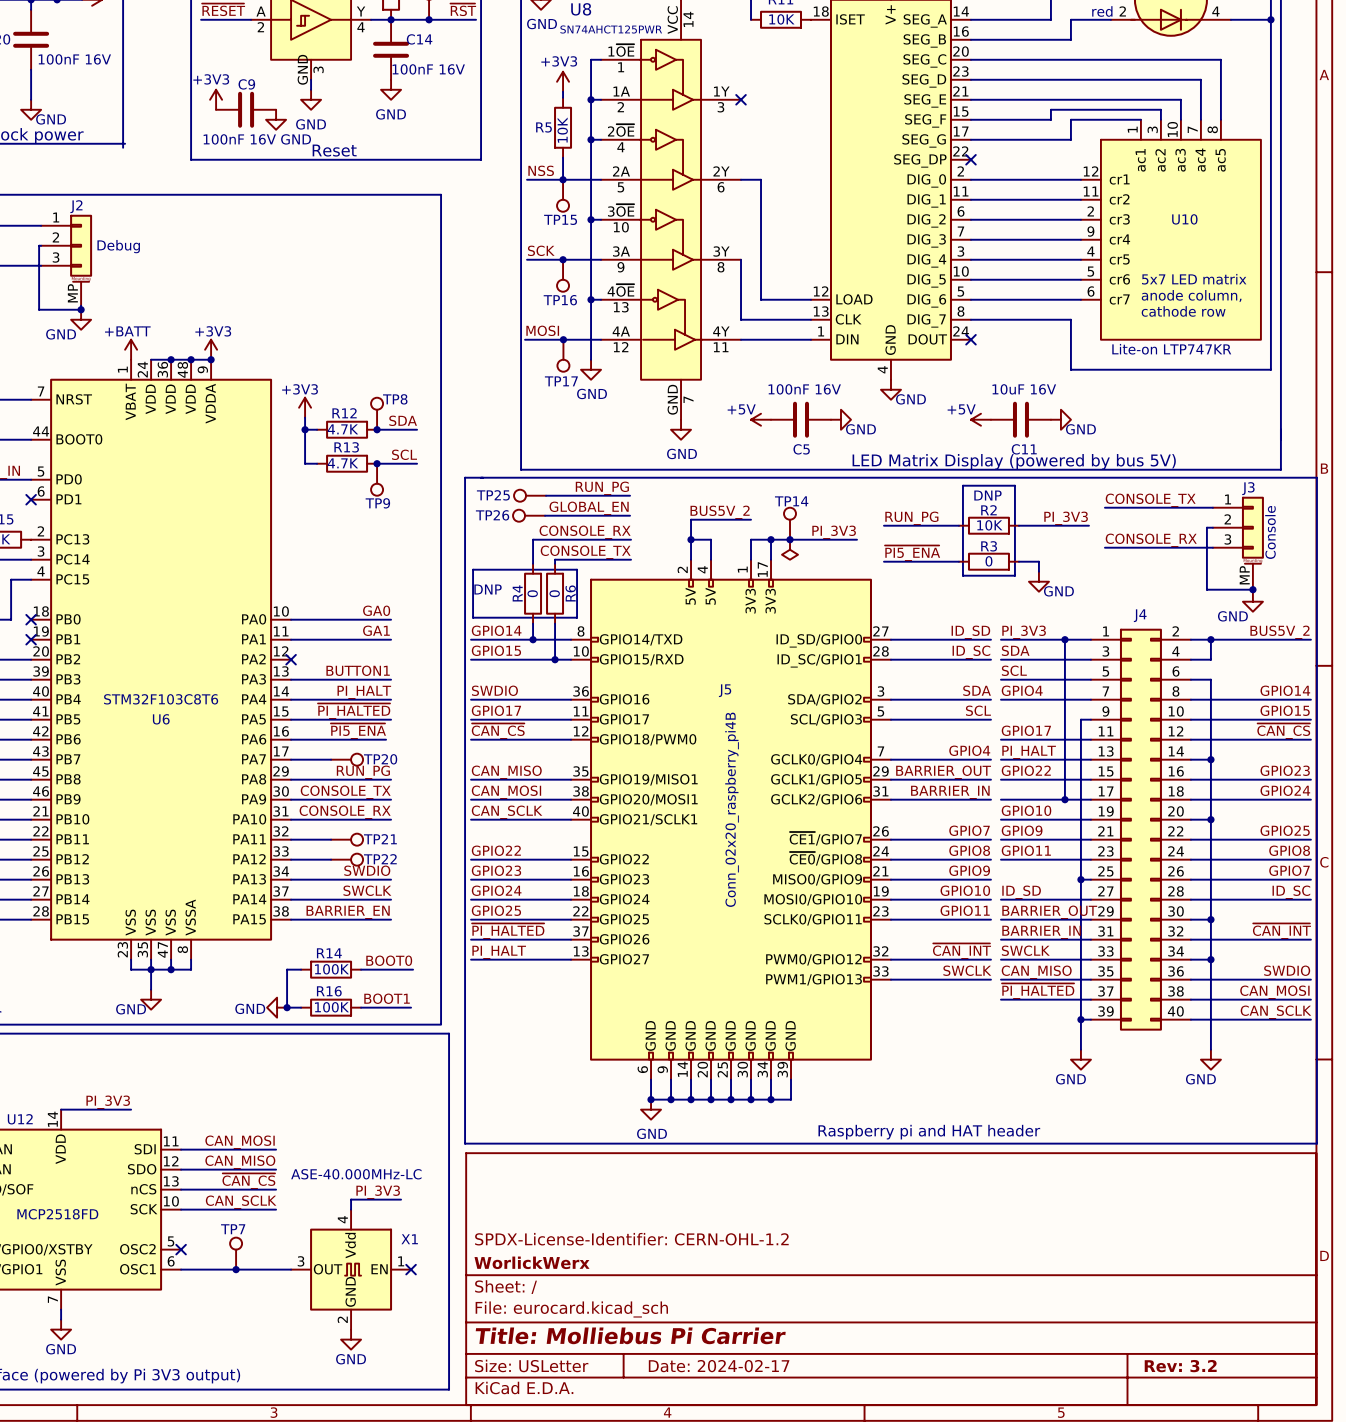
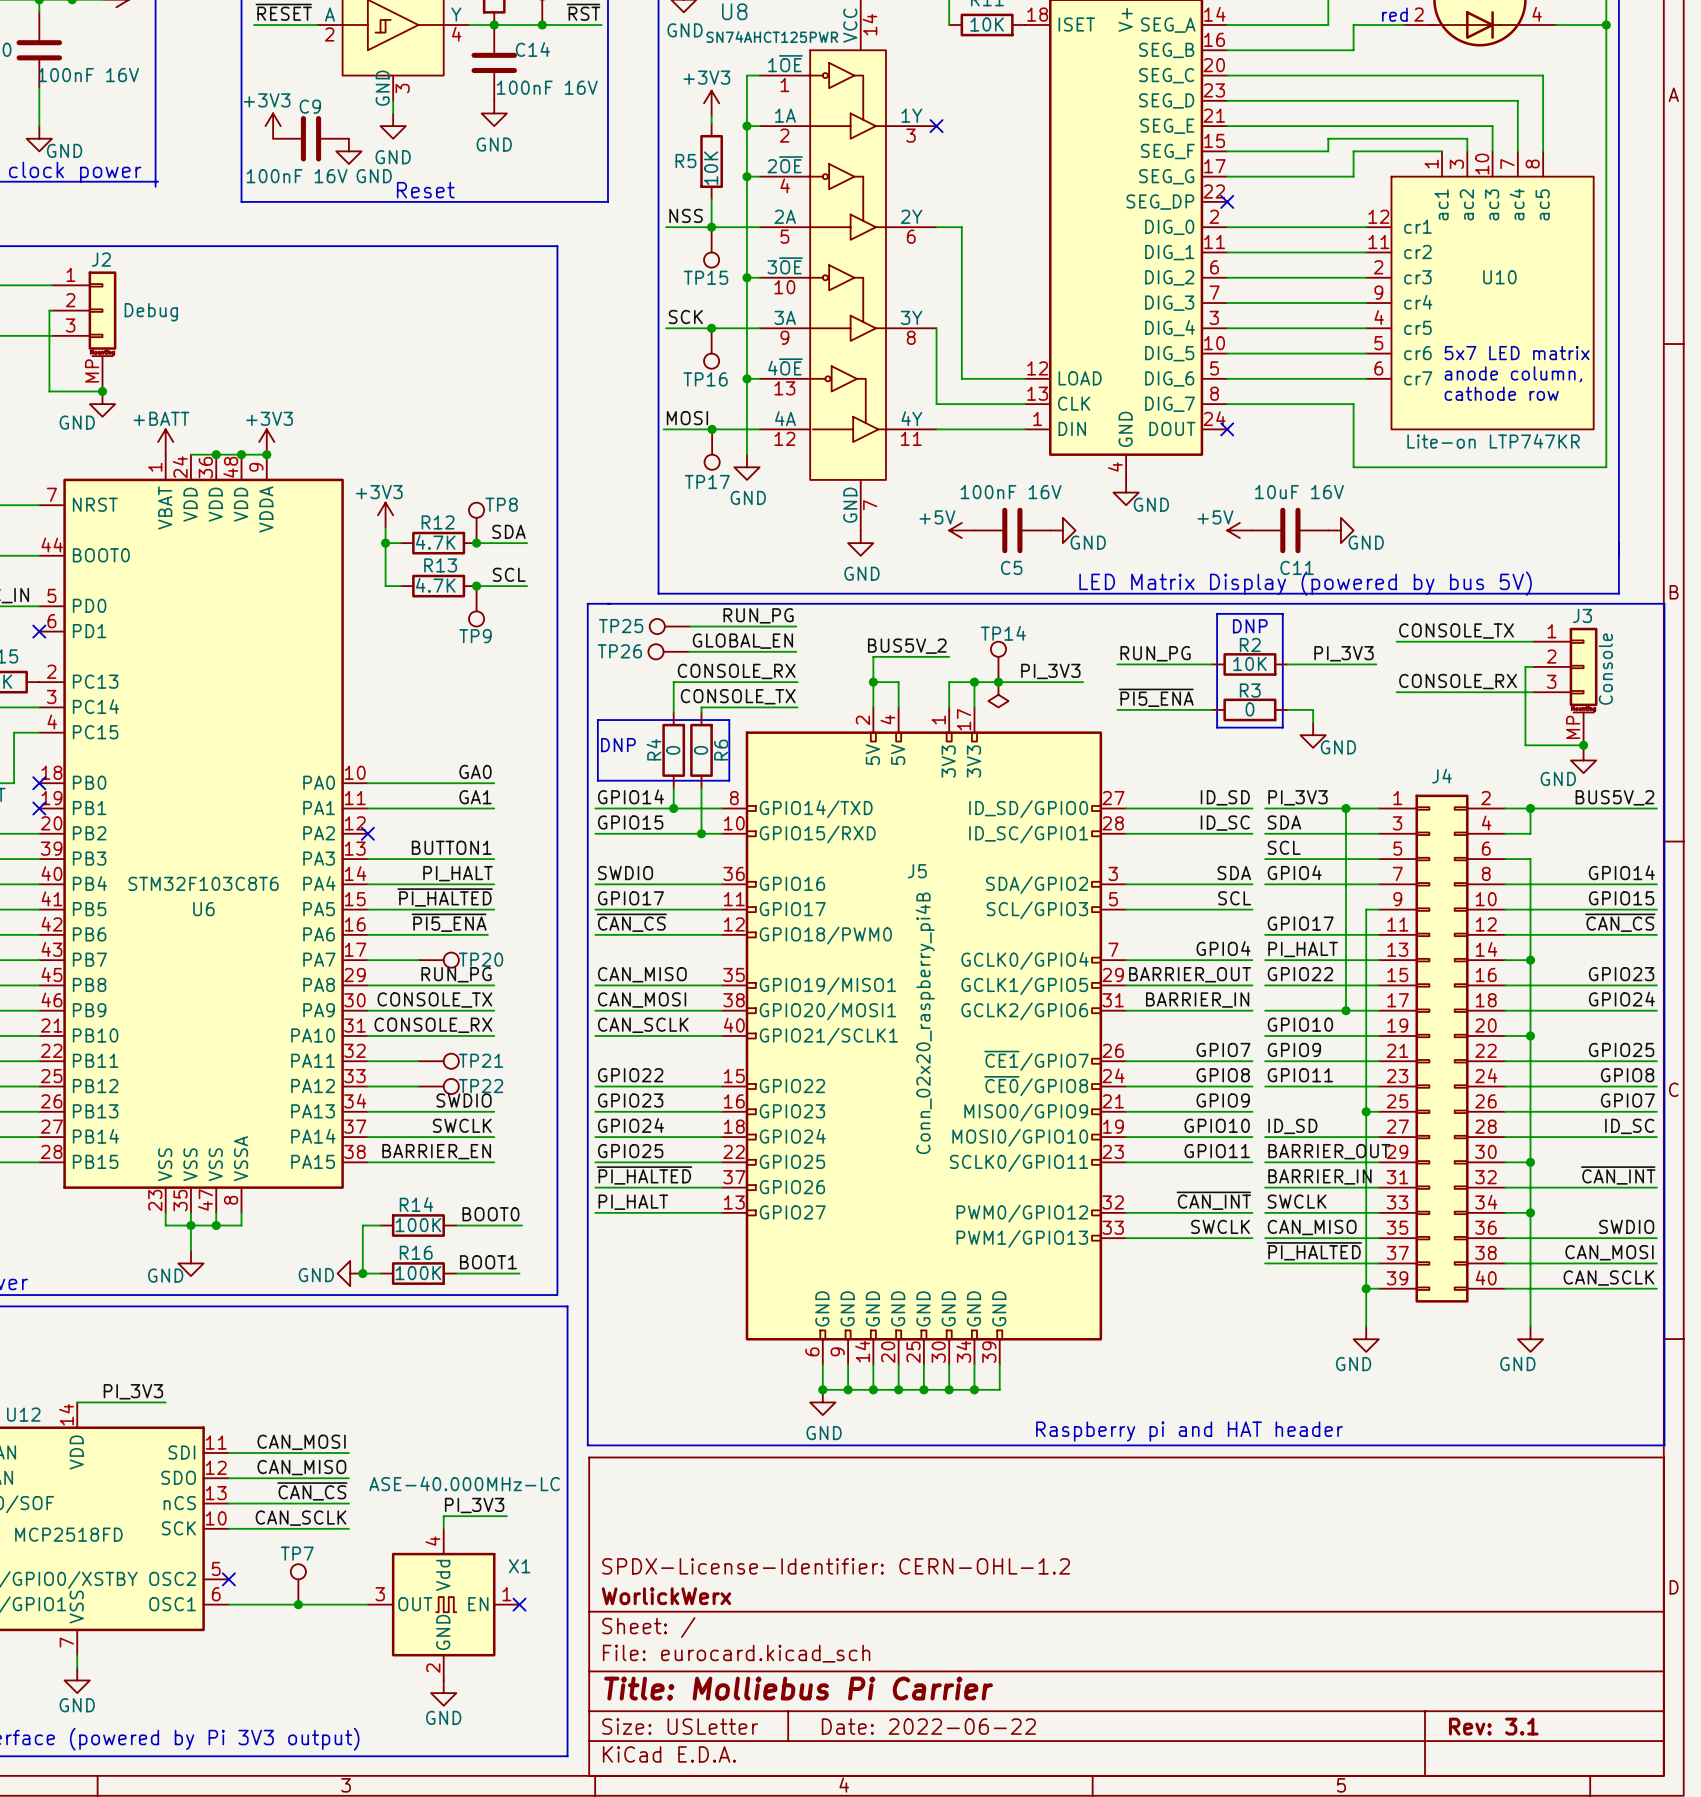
title block: Date: 2024-02-17 (719, 1366) -> Date: 2022-06-22 (928, 1726)
title block: Rev: 3.2 (1180, 1366) -> Rev: 3.1 (1493, 1726)

